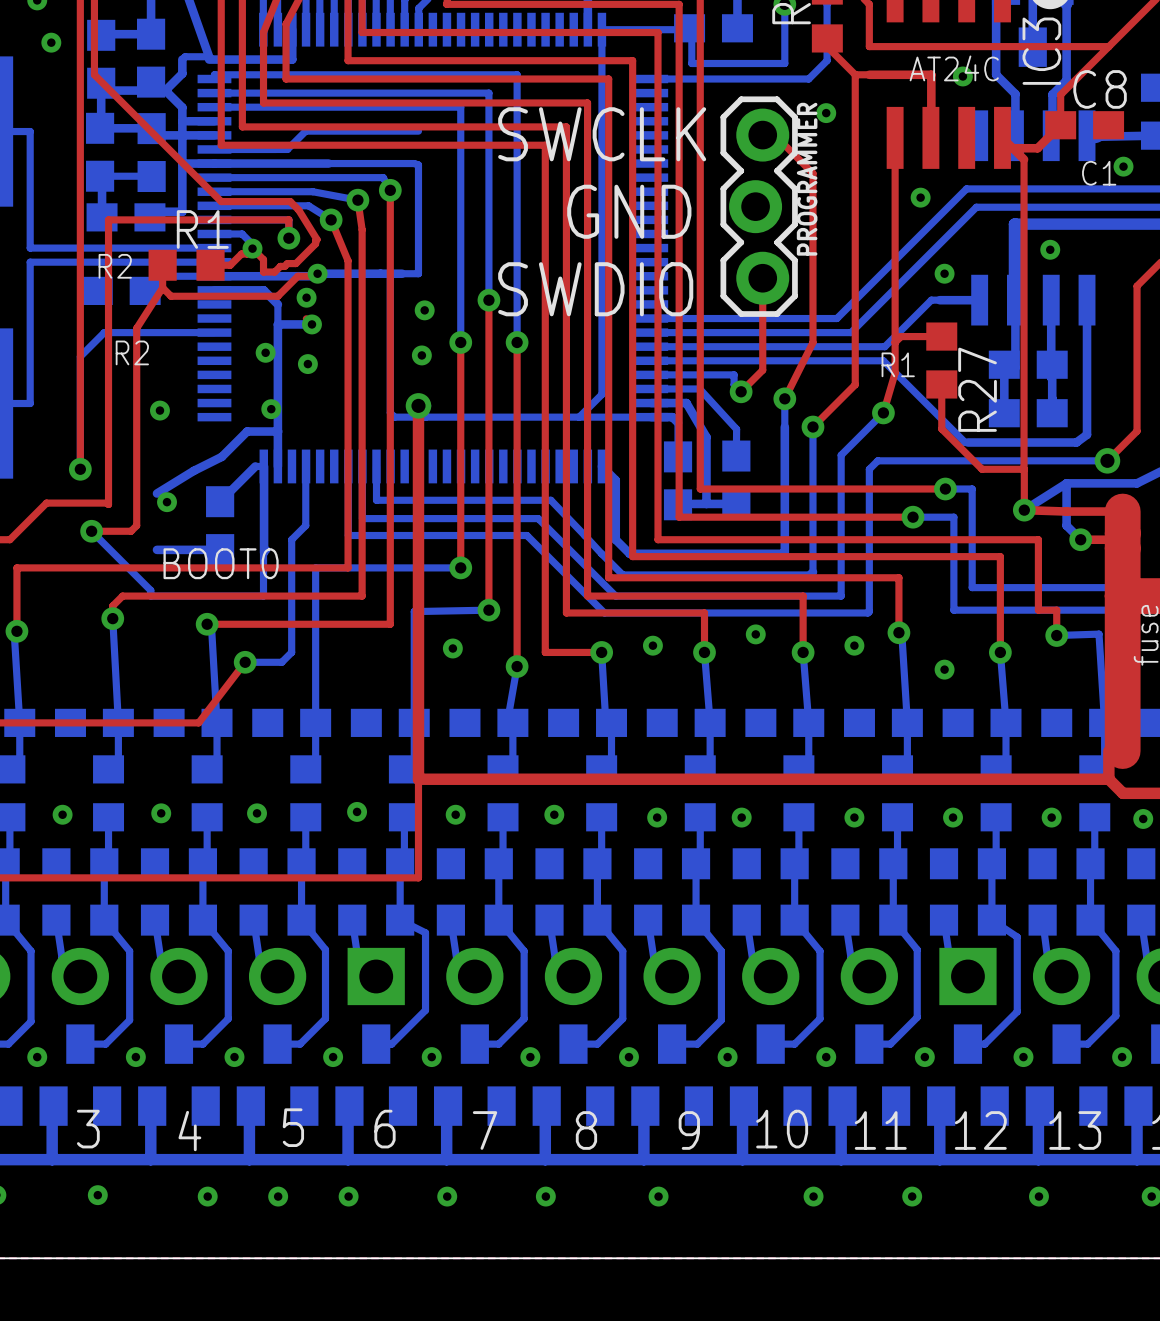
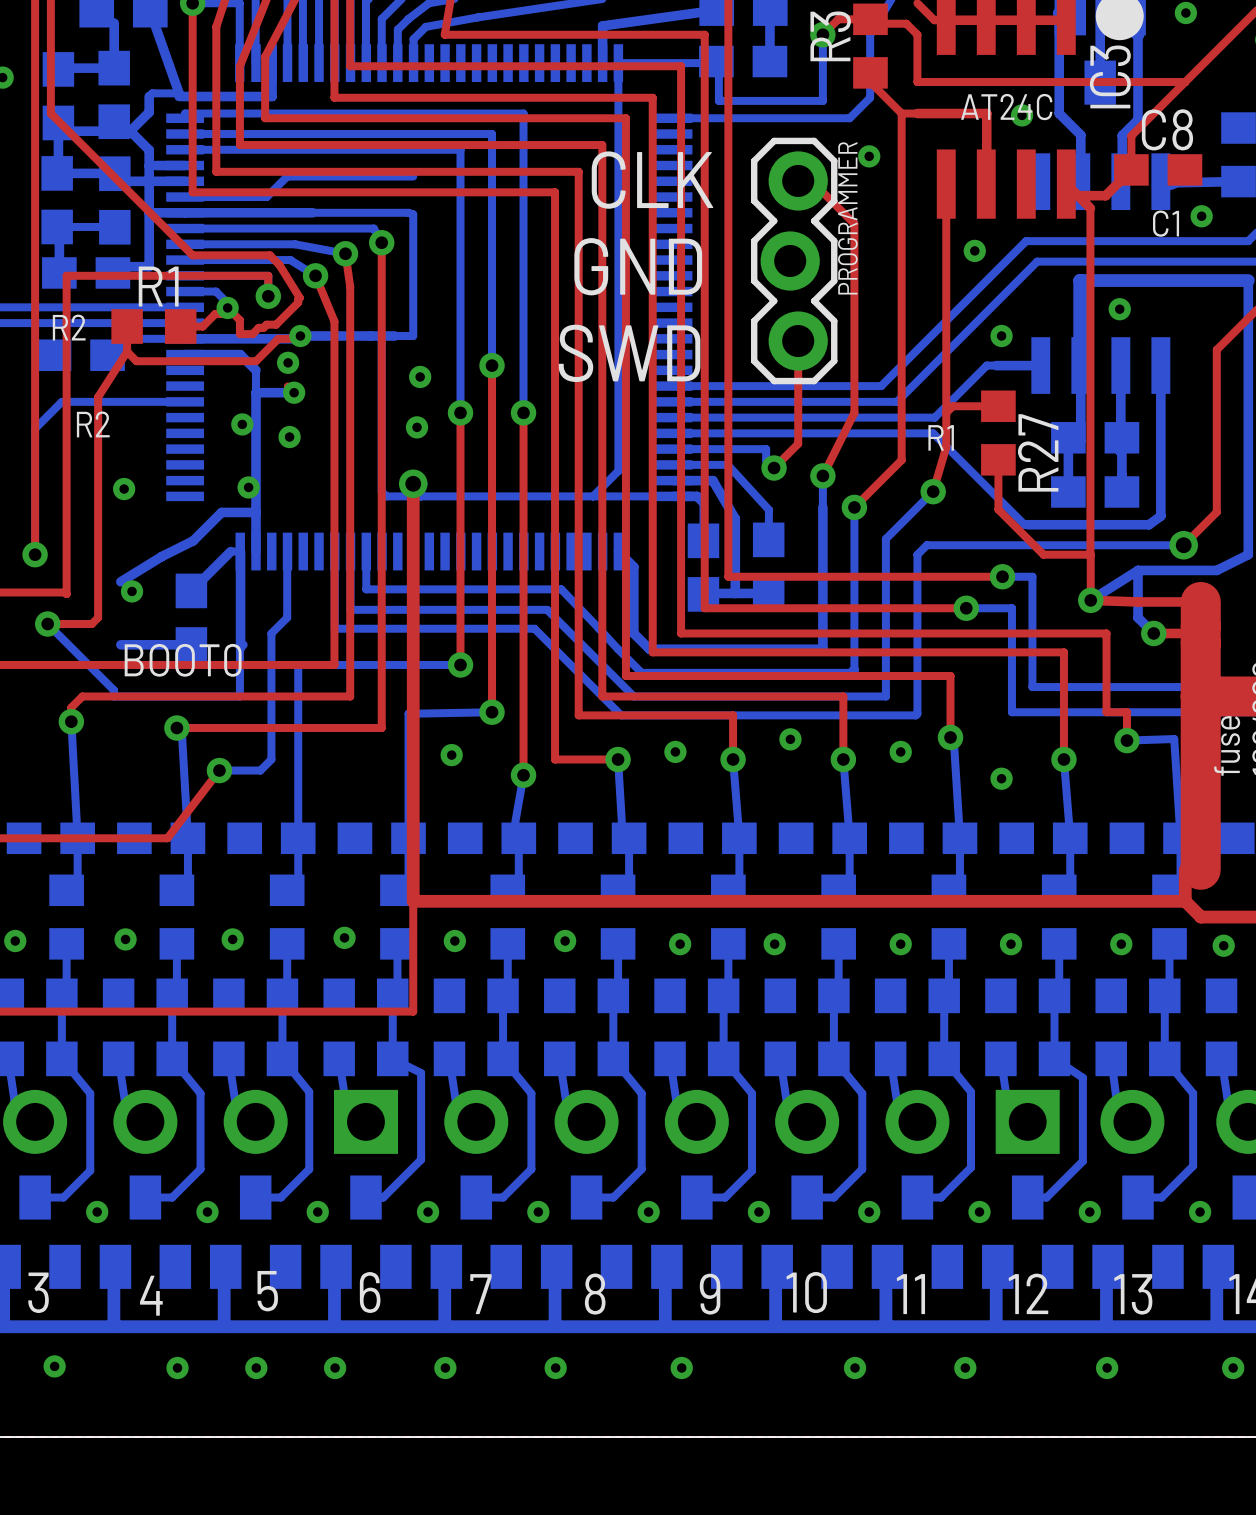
text: SWCLK (602, 134) -> CLK (652, 180)
text: SWDIO (595, 289) -> SWD (629, 353)

